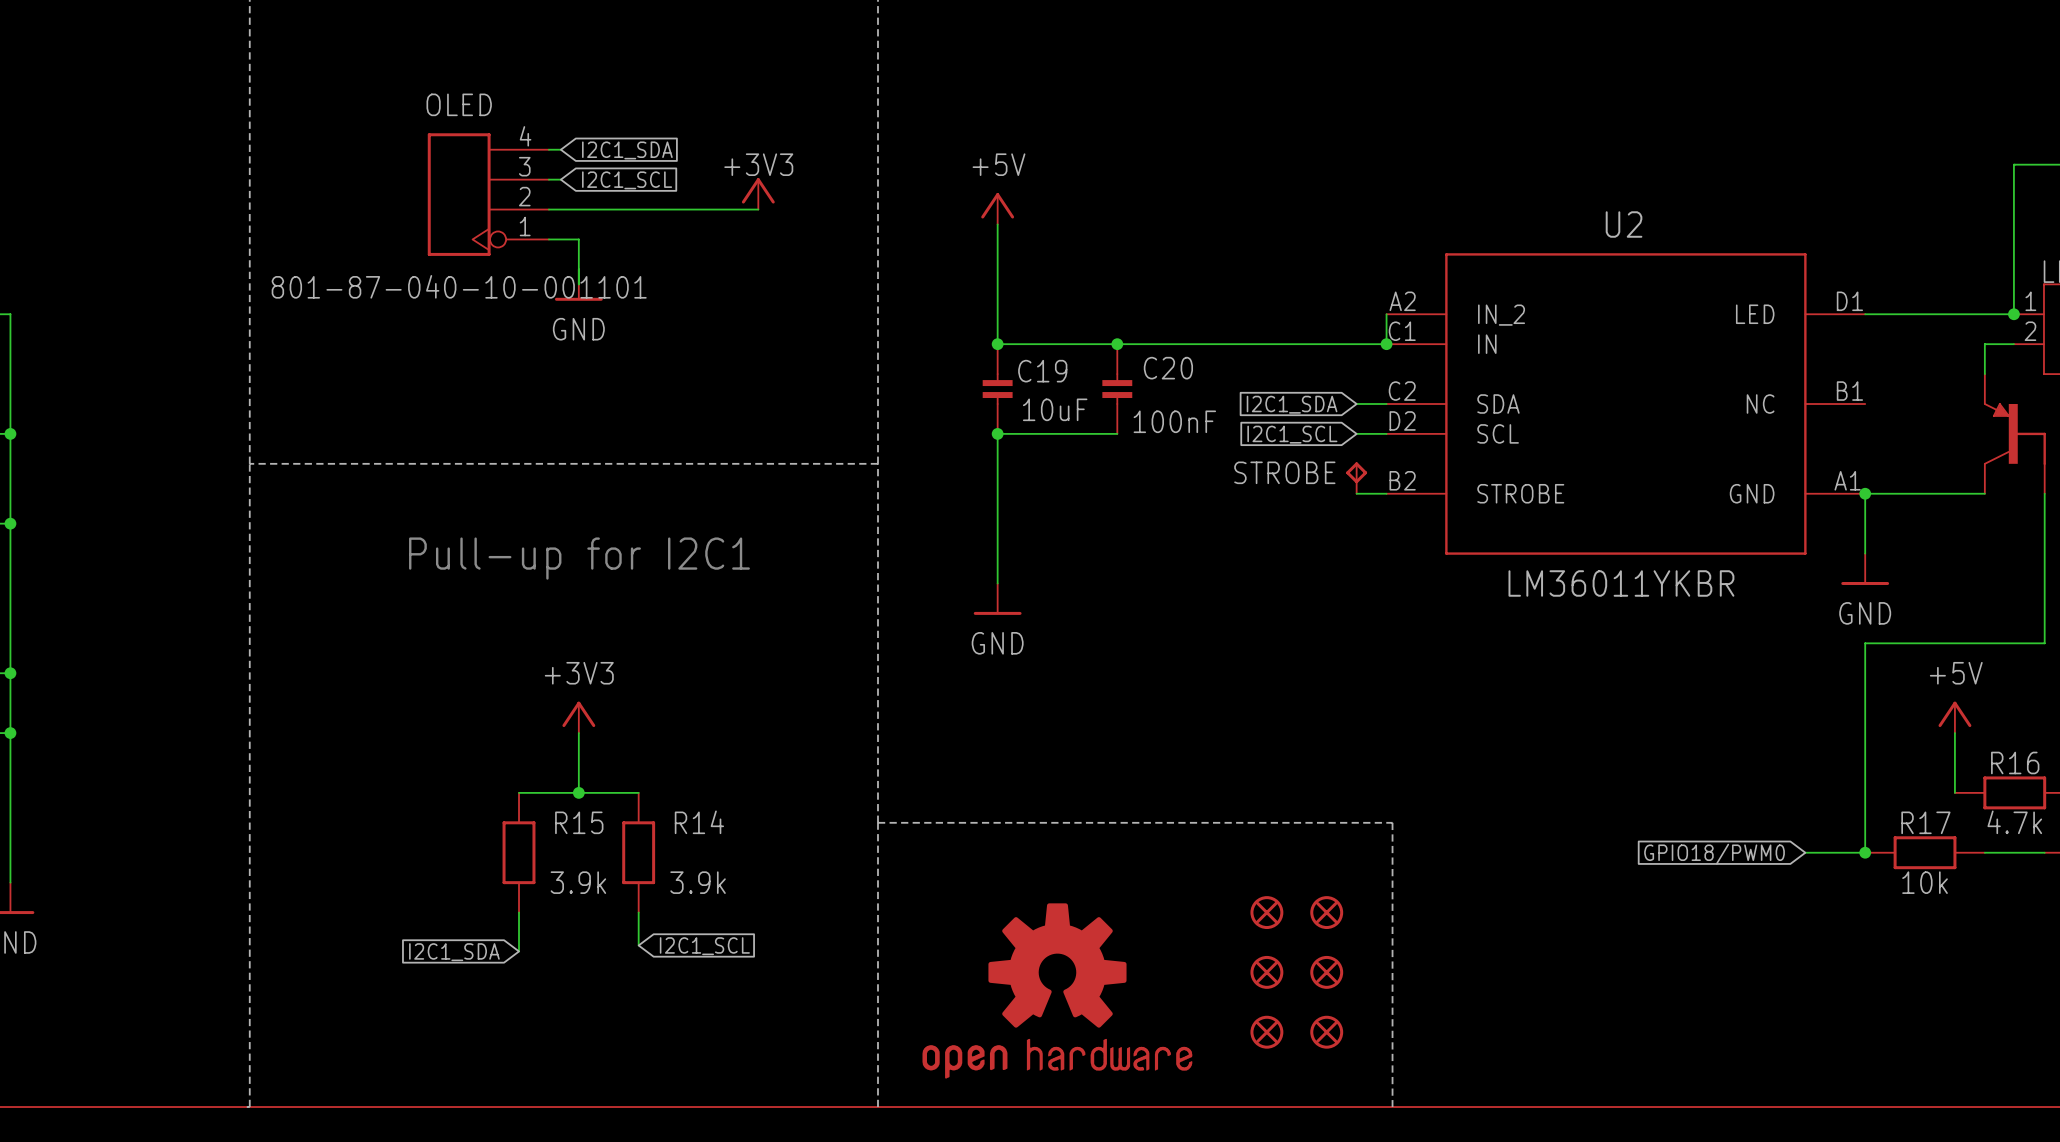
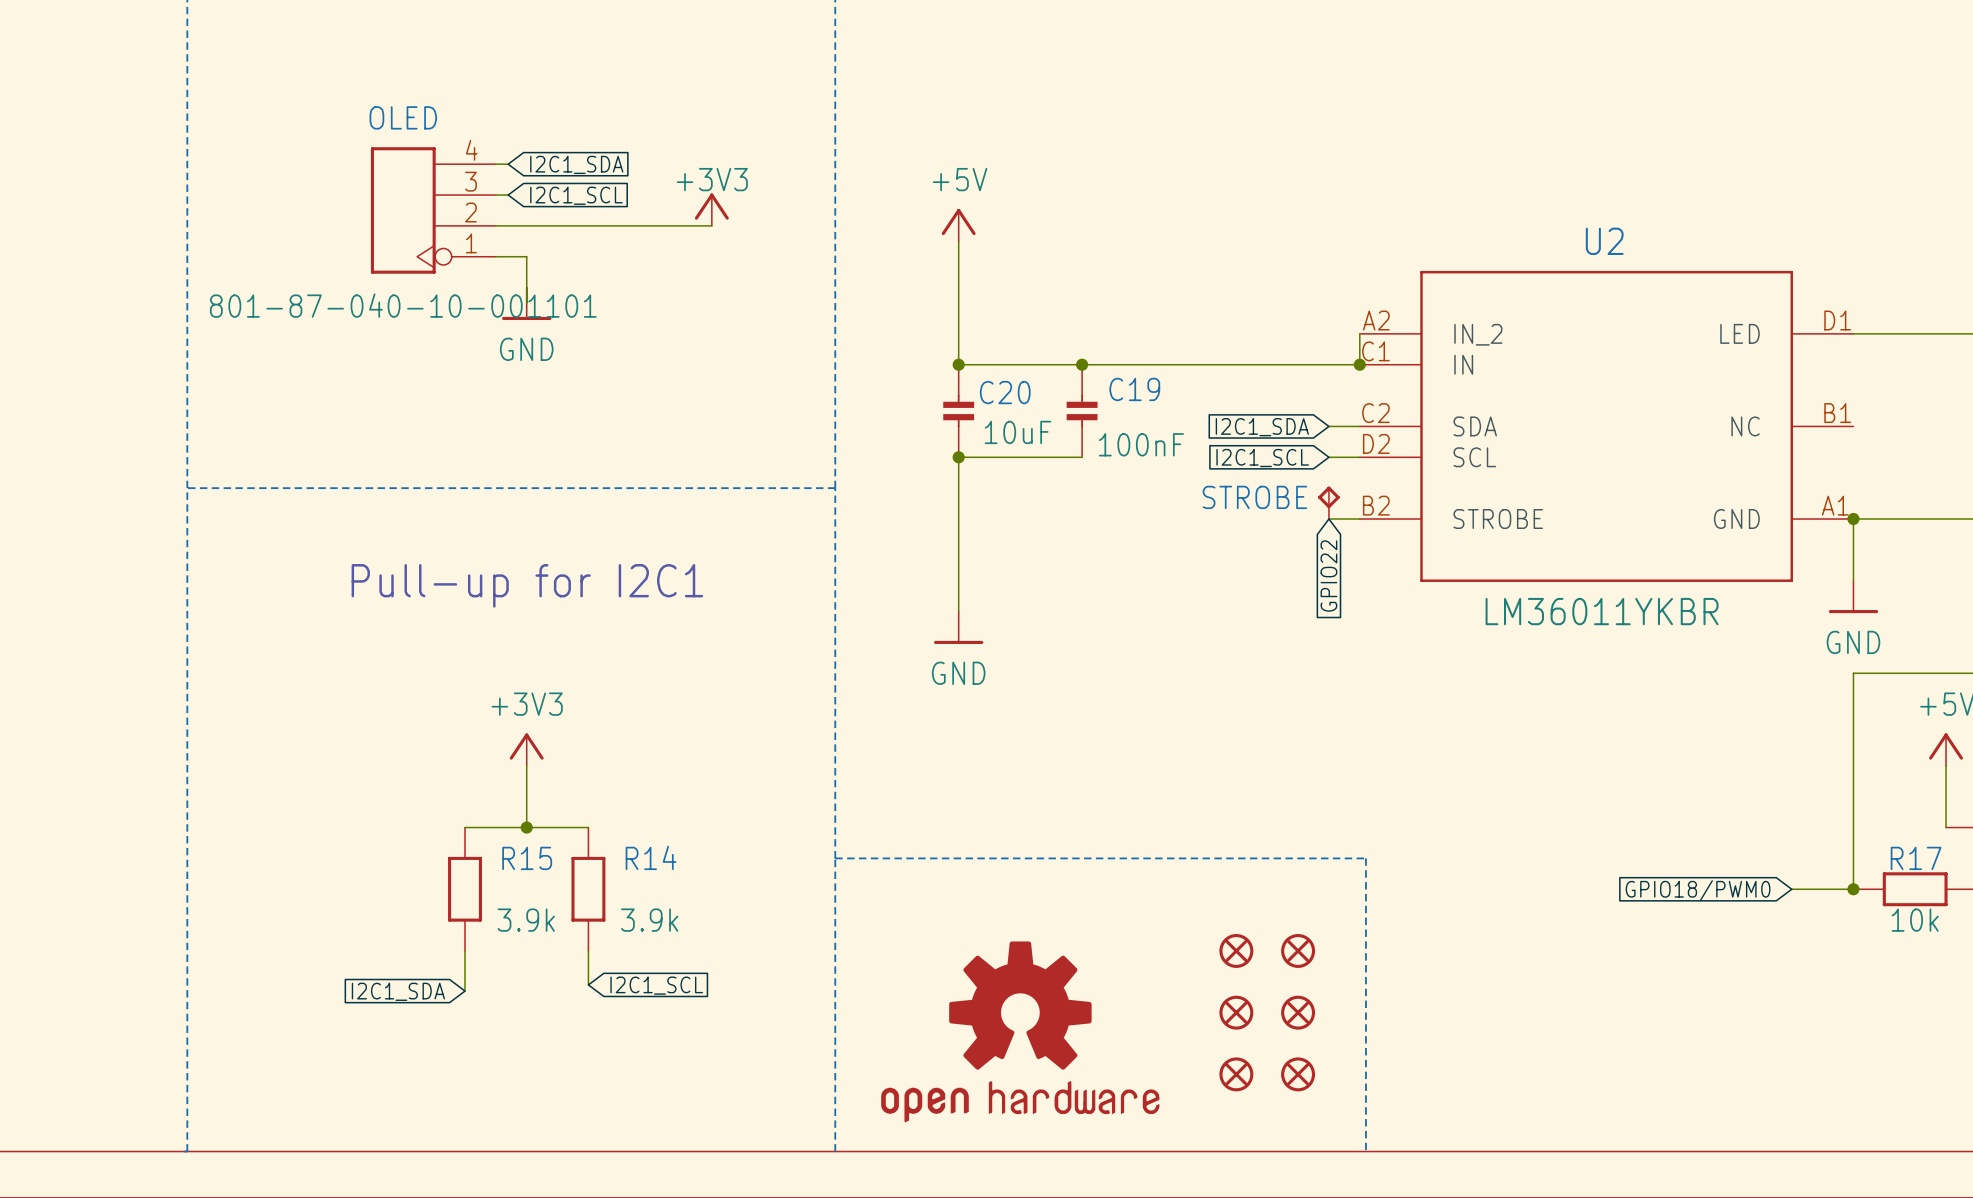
C20 name: C20 (1168, 368) -> C19 (1134, 389)
C19 name: C19 (1042, 371) -> C20 (1005, 392)
global label: none -> GPIO22 (1328, 576)

